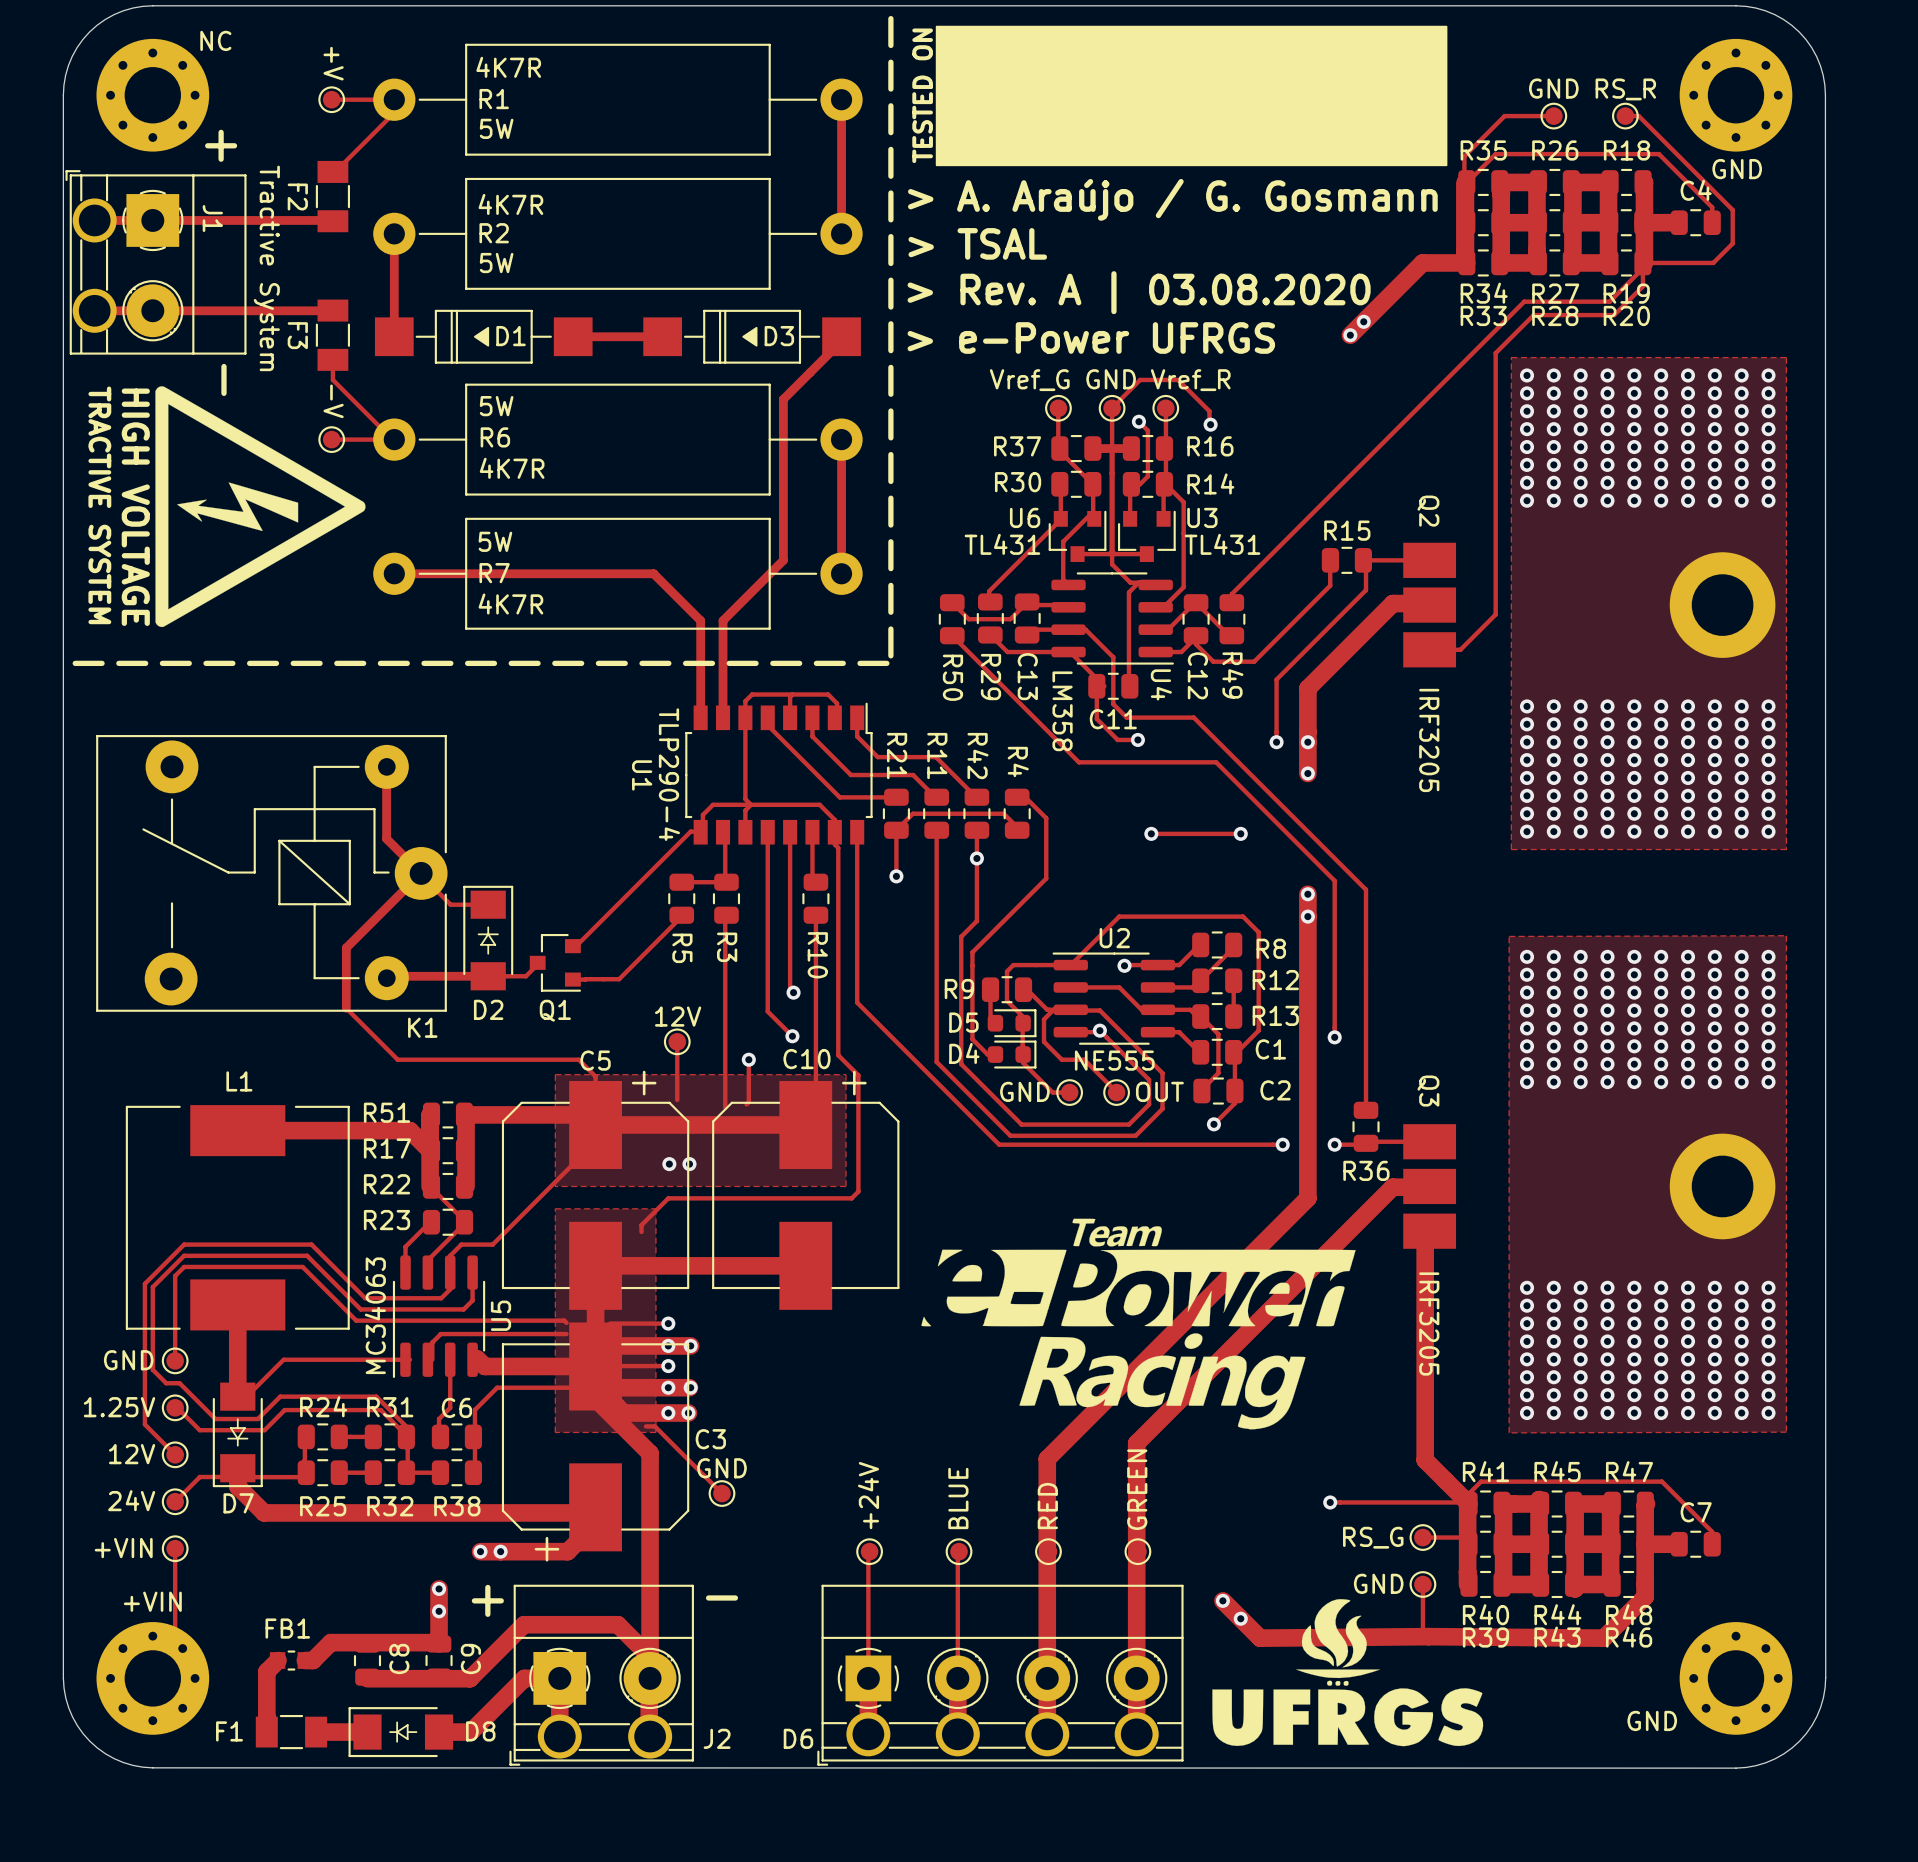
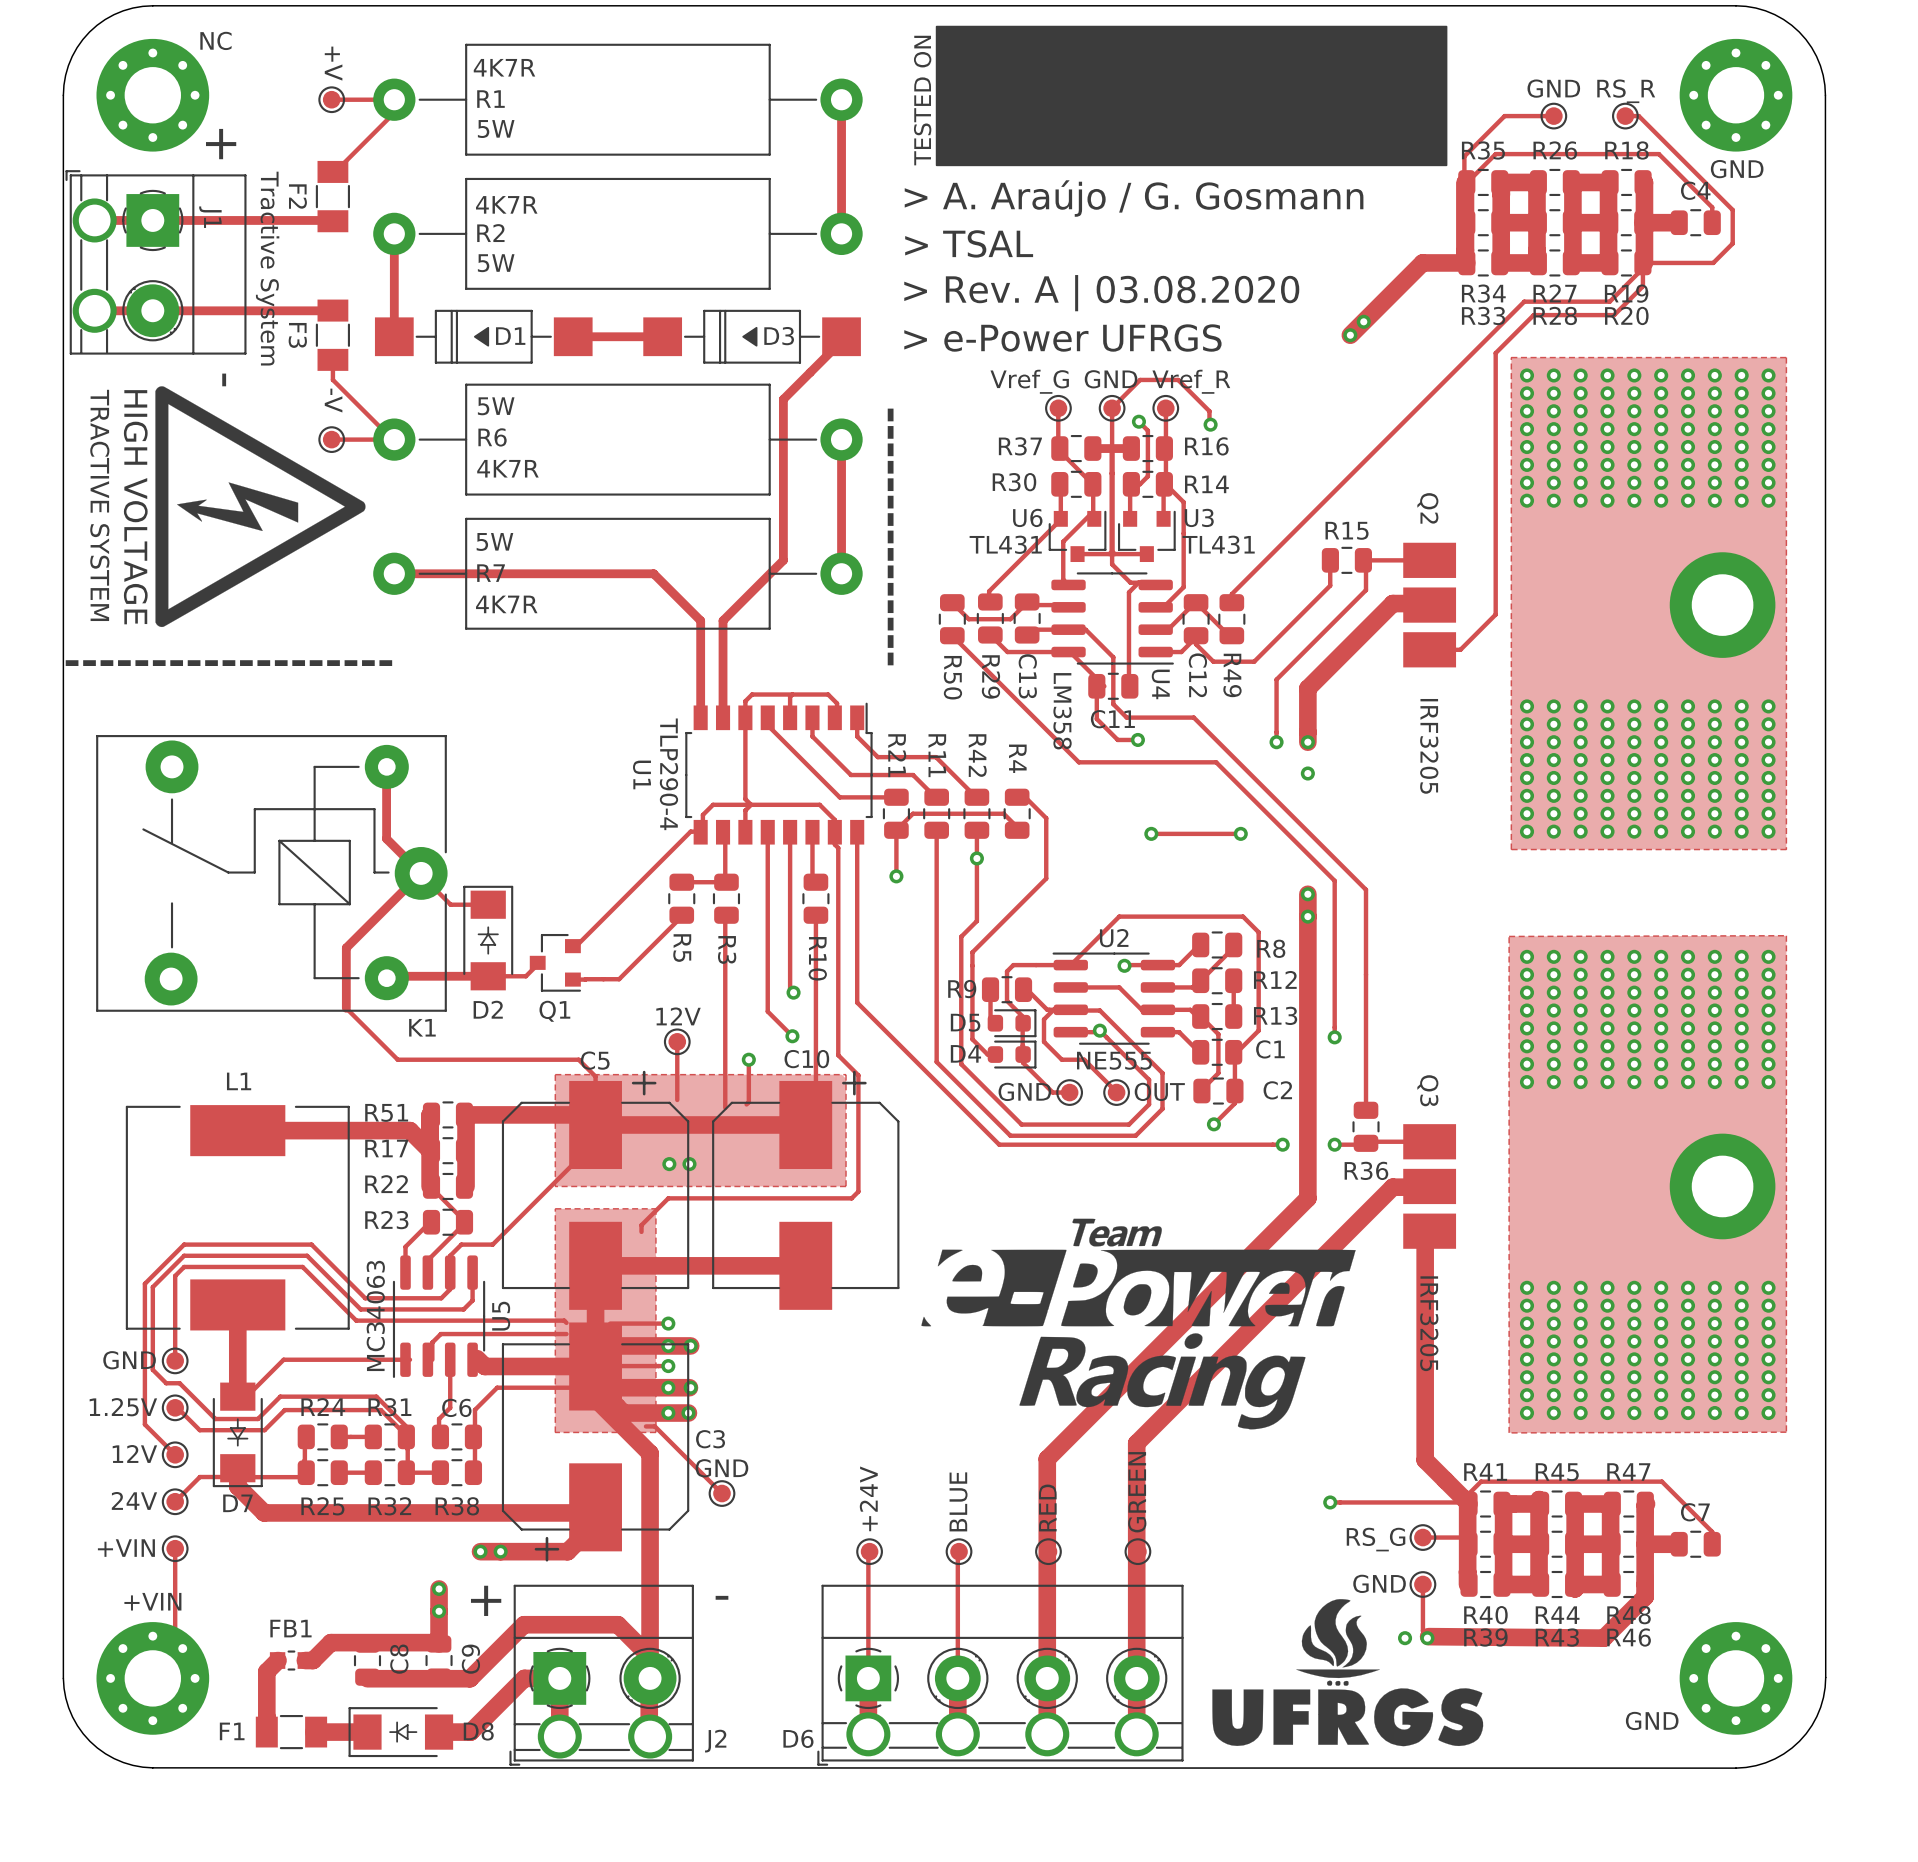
track: (1307, 742) (1307, 773) -> none
track: (1222, 1600) (1260, 1638) (1428, 1636) -> none
via: (1222, 1600) -> none
via: (1240, 1618) -> none
via: none -> (1405, 1638)
via: none -> (1427, 1638)

